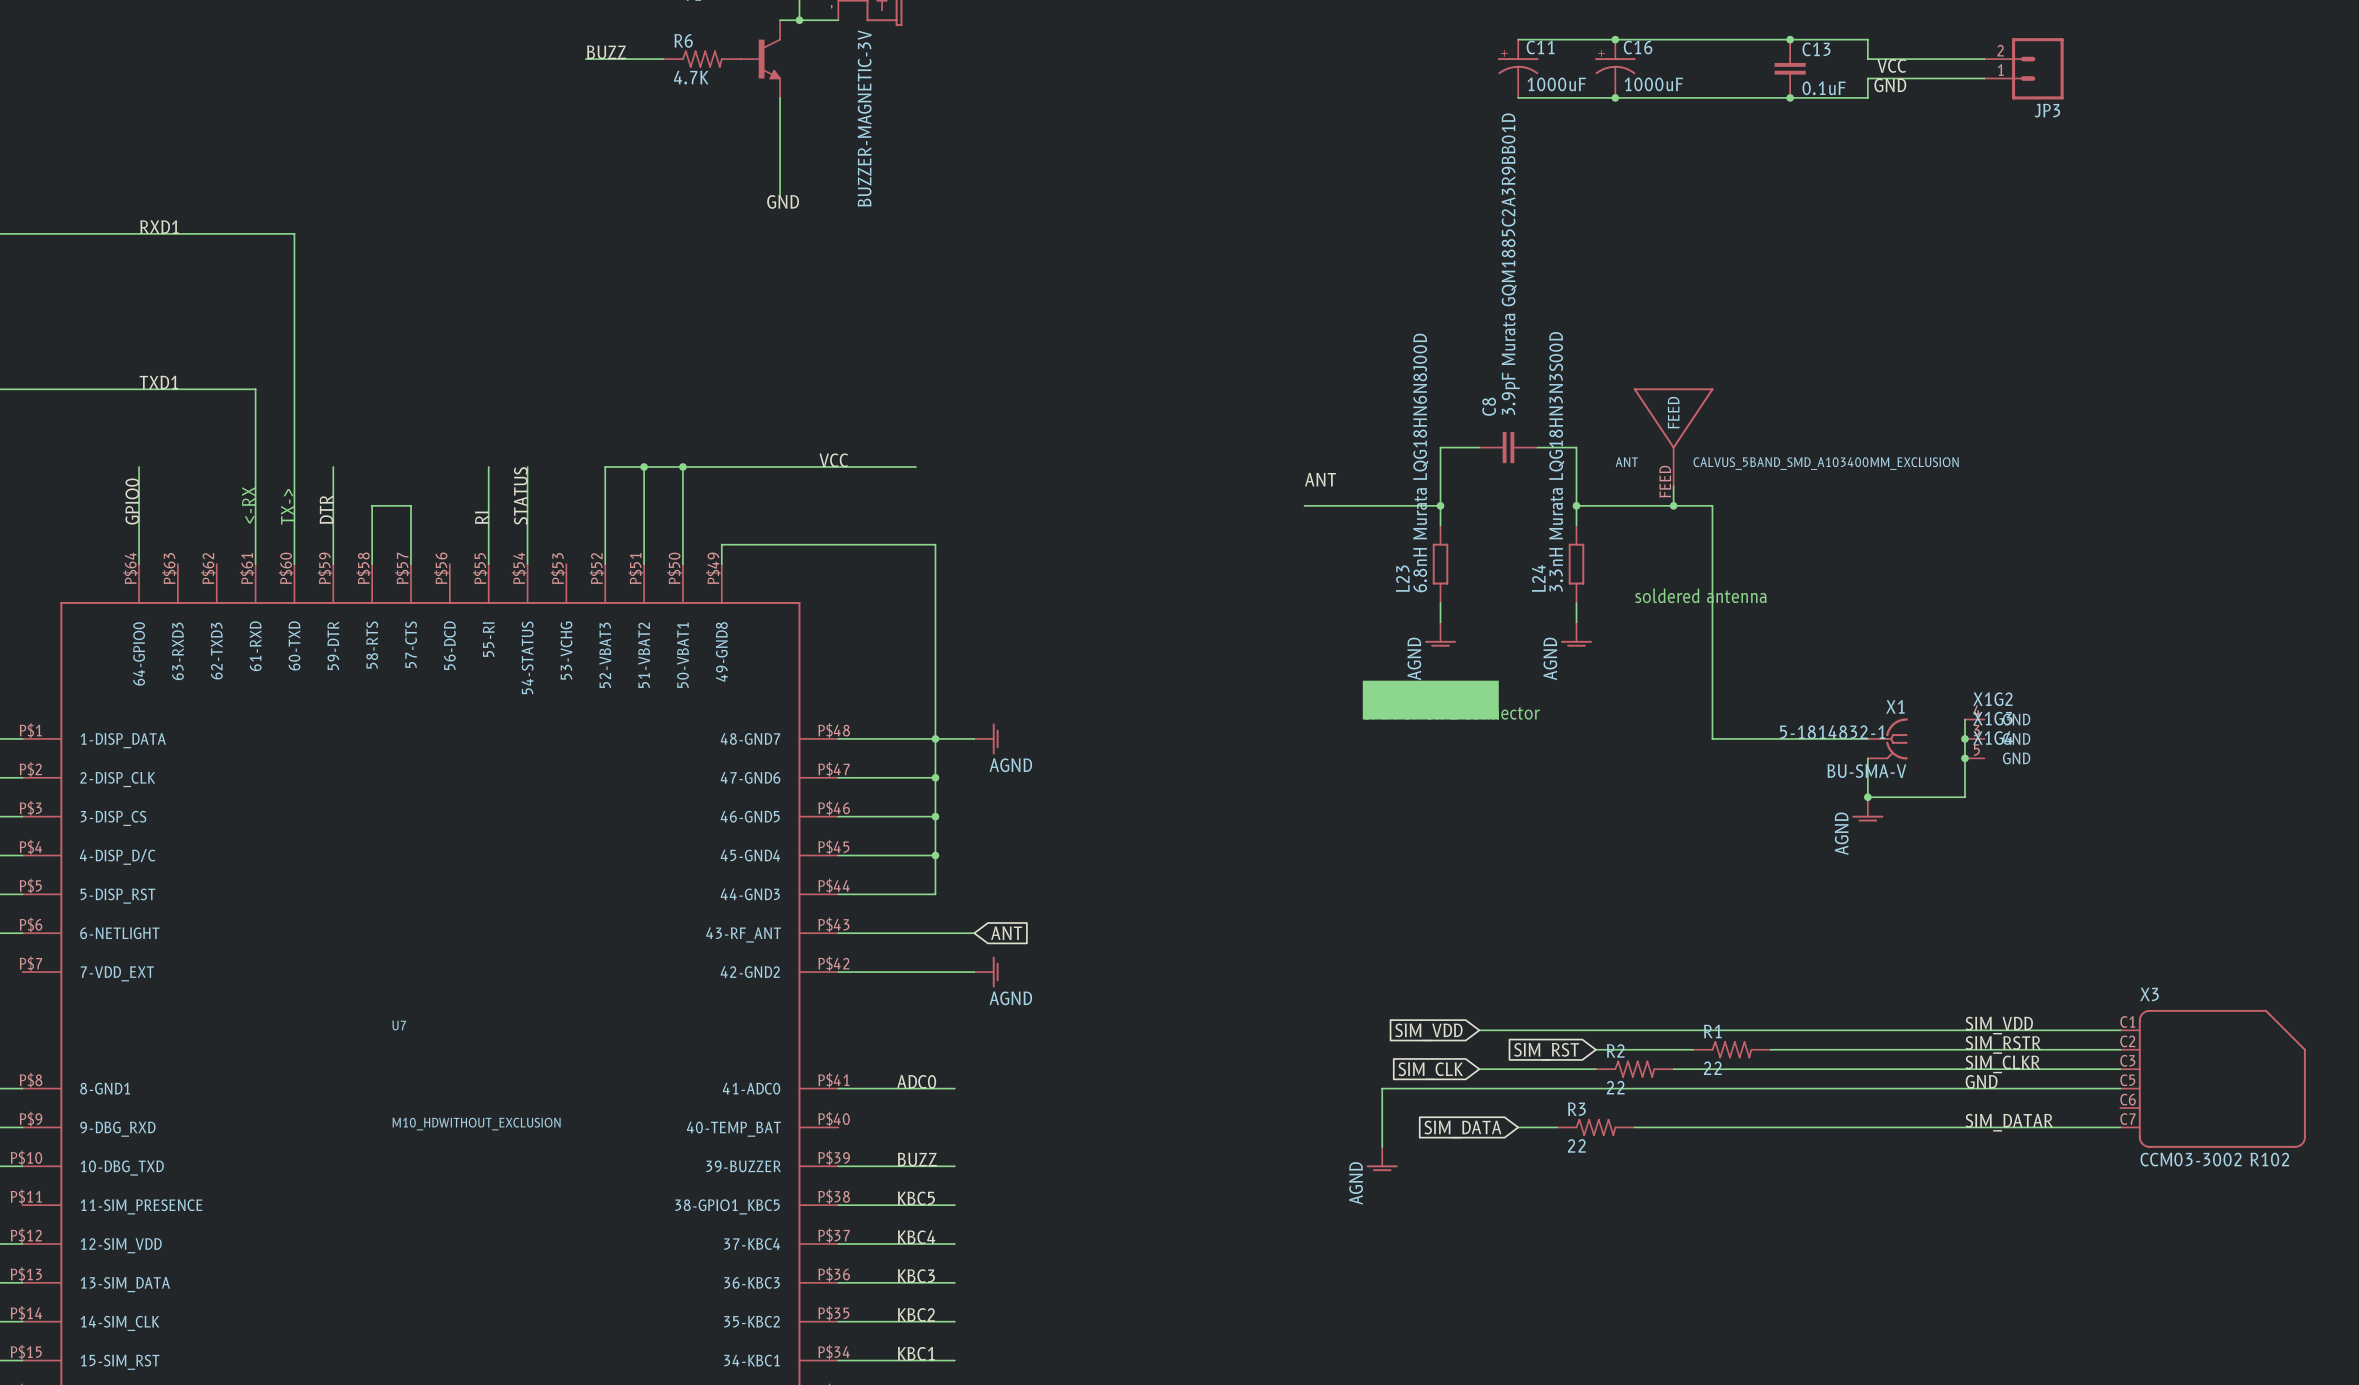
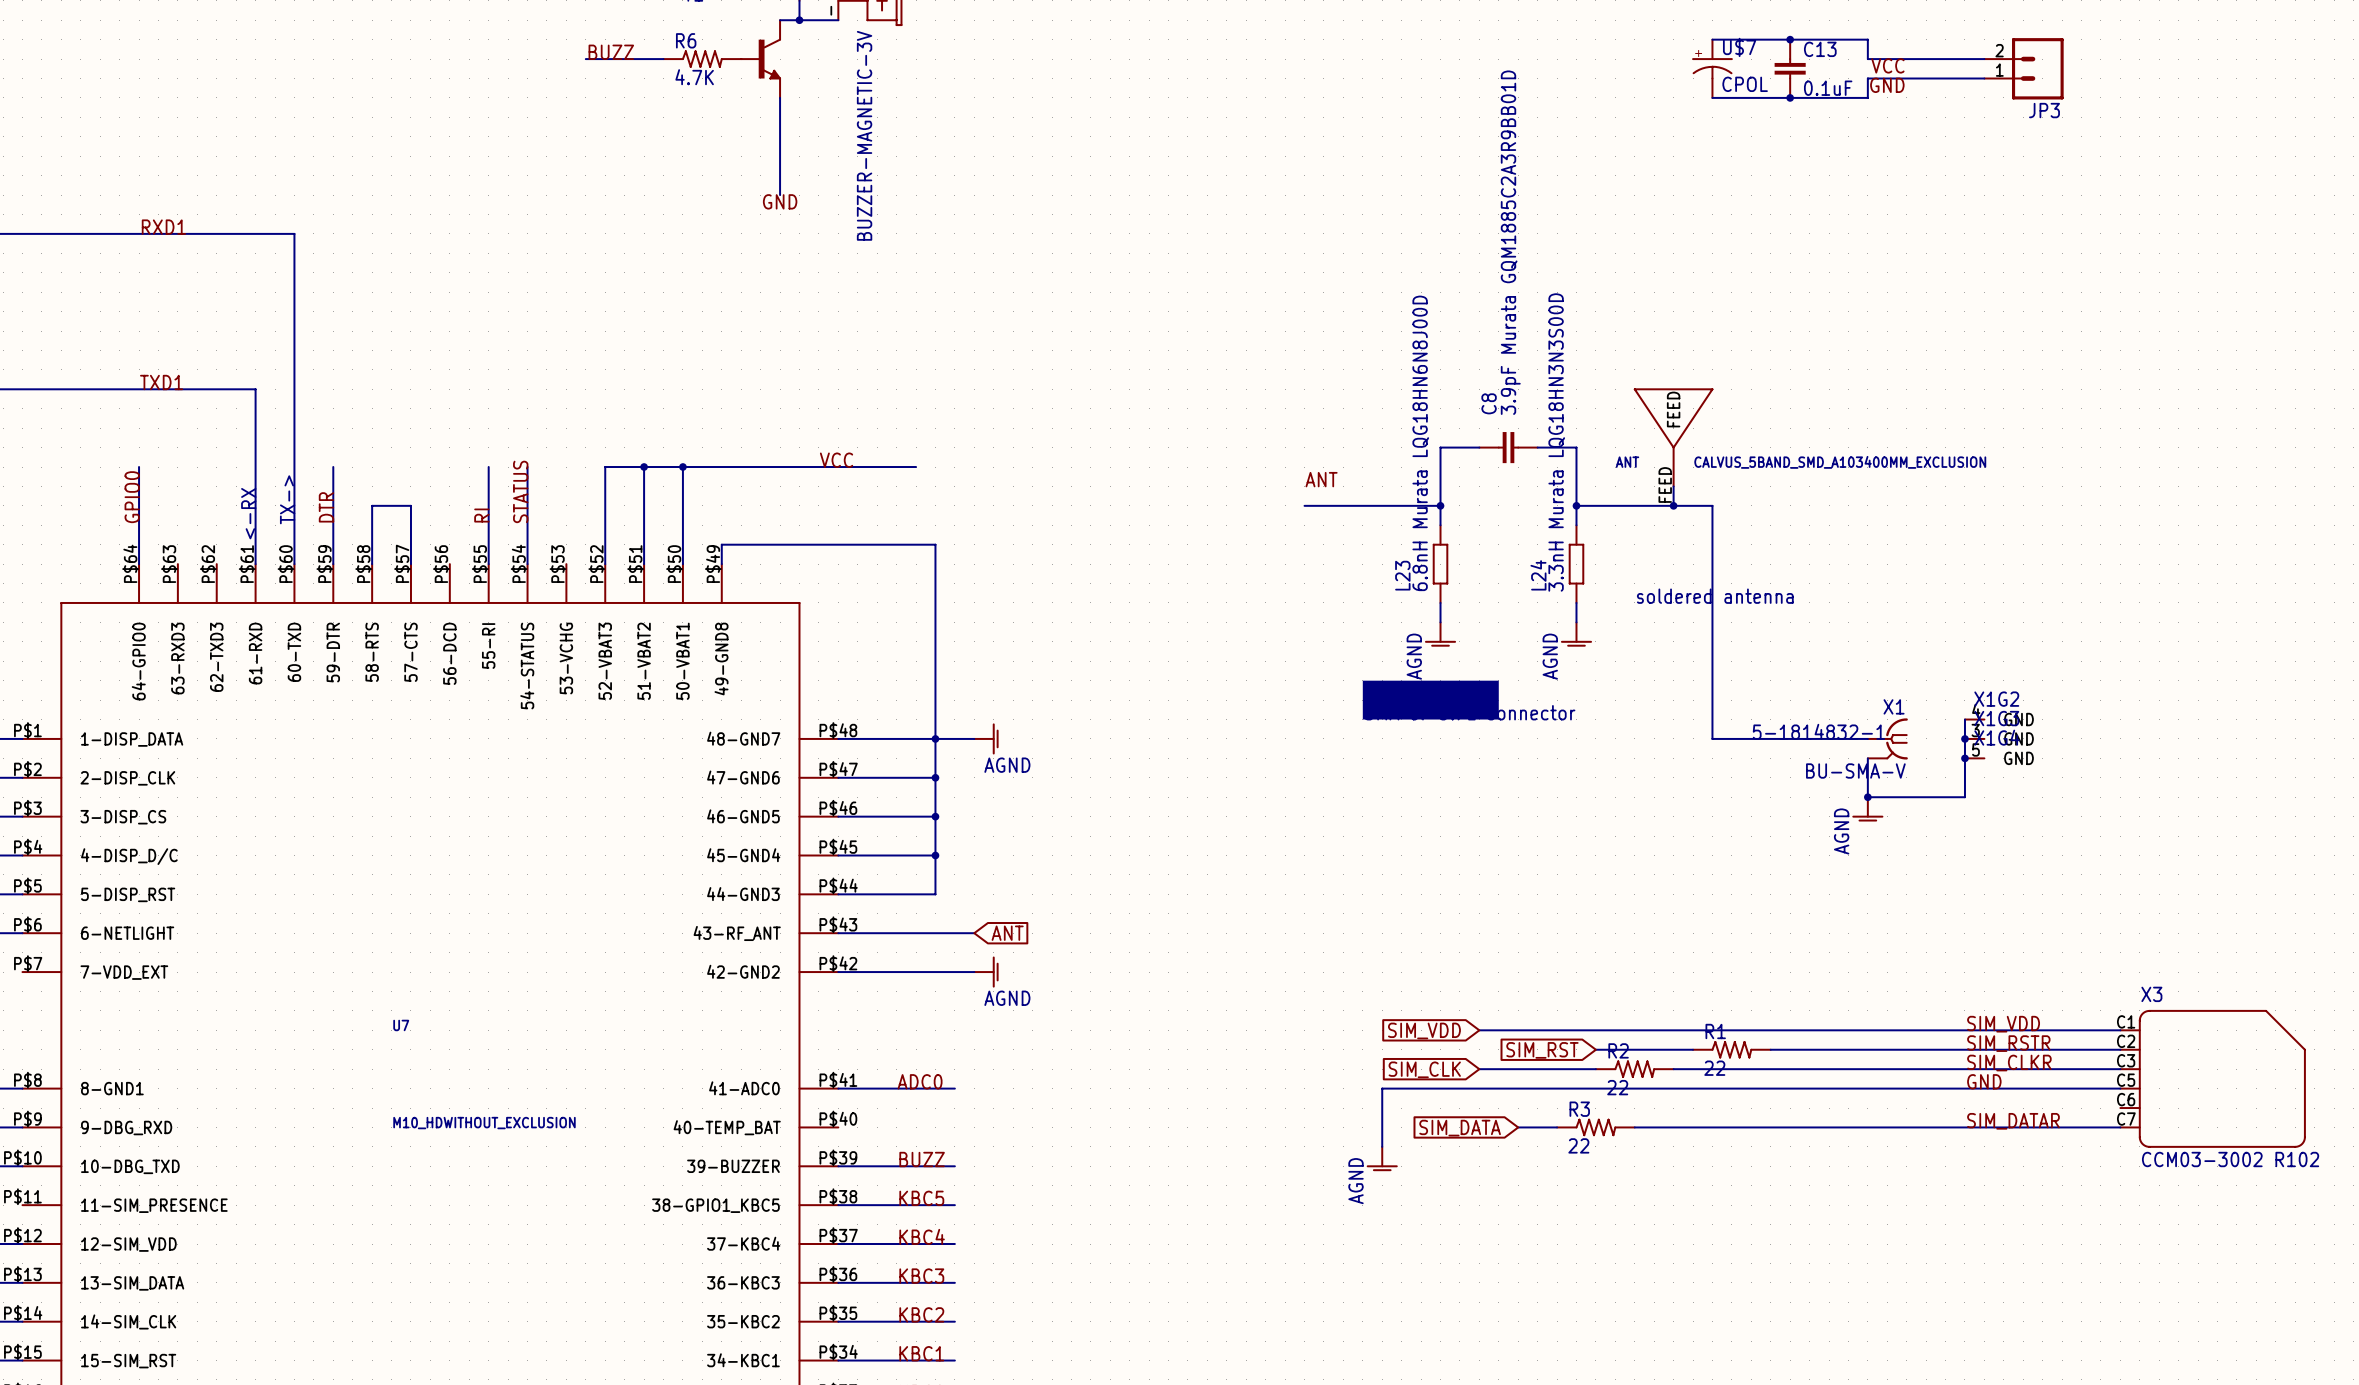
wire: (1518, 39) (1712, 39) -> none
junction: (1615, 39) -> none
C11: 1000uF (1518, 68) -> none
C16: 1000uF (1615, 68) -> none
U$7: none -> CPOL (1712, 68)
wire: (1518, 97) (1712, 97) -> none
junction: (1615, 97) -> none

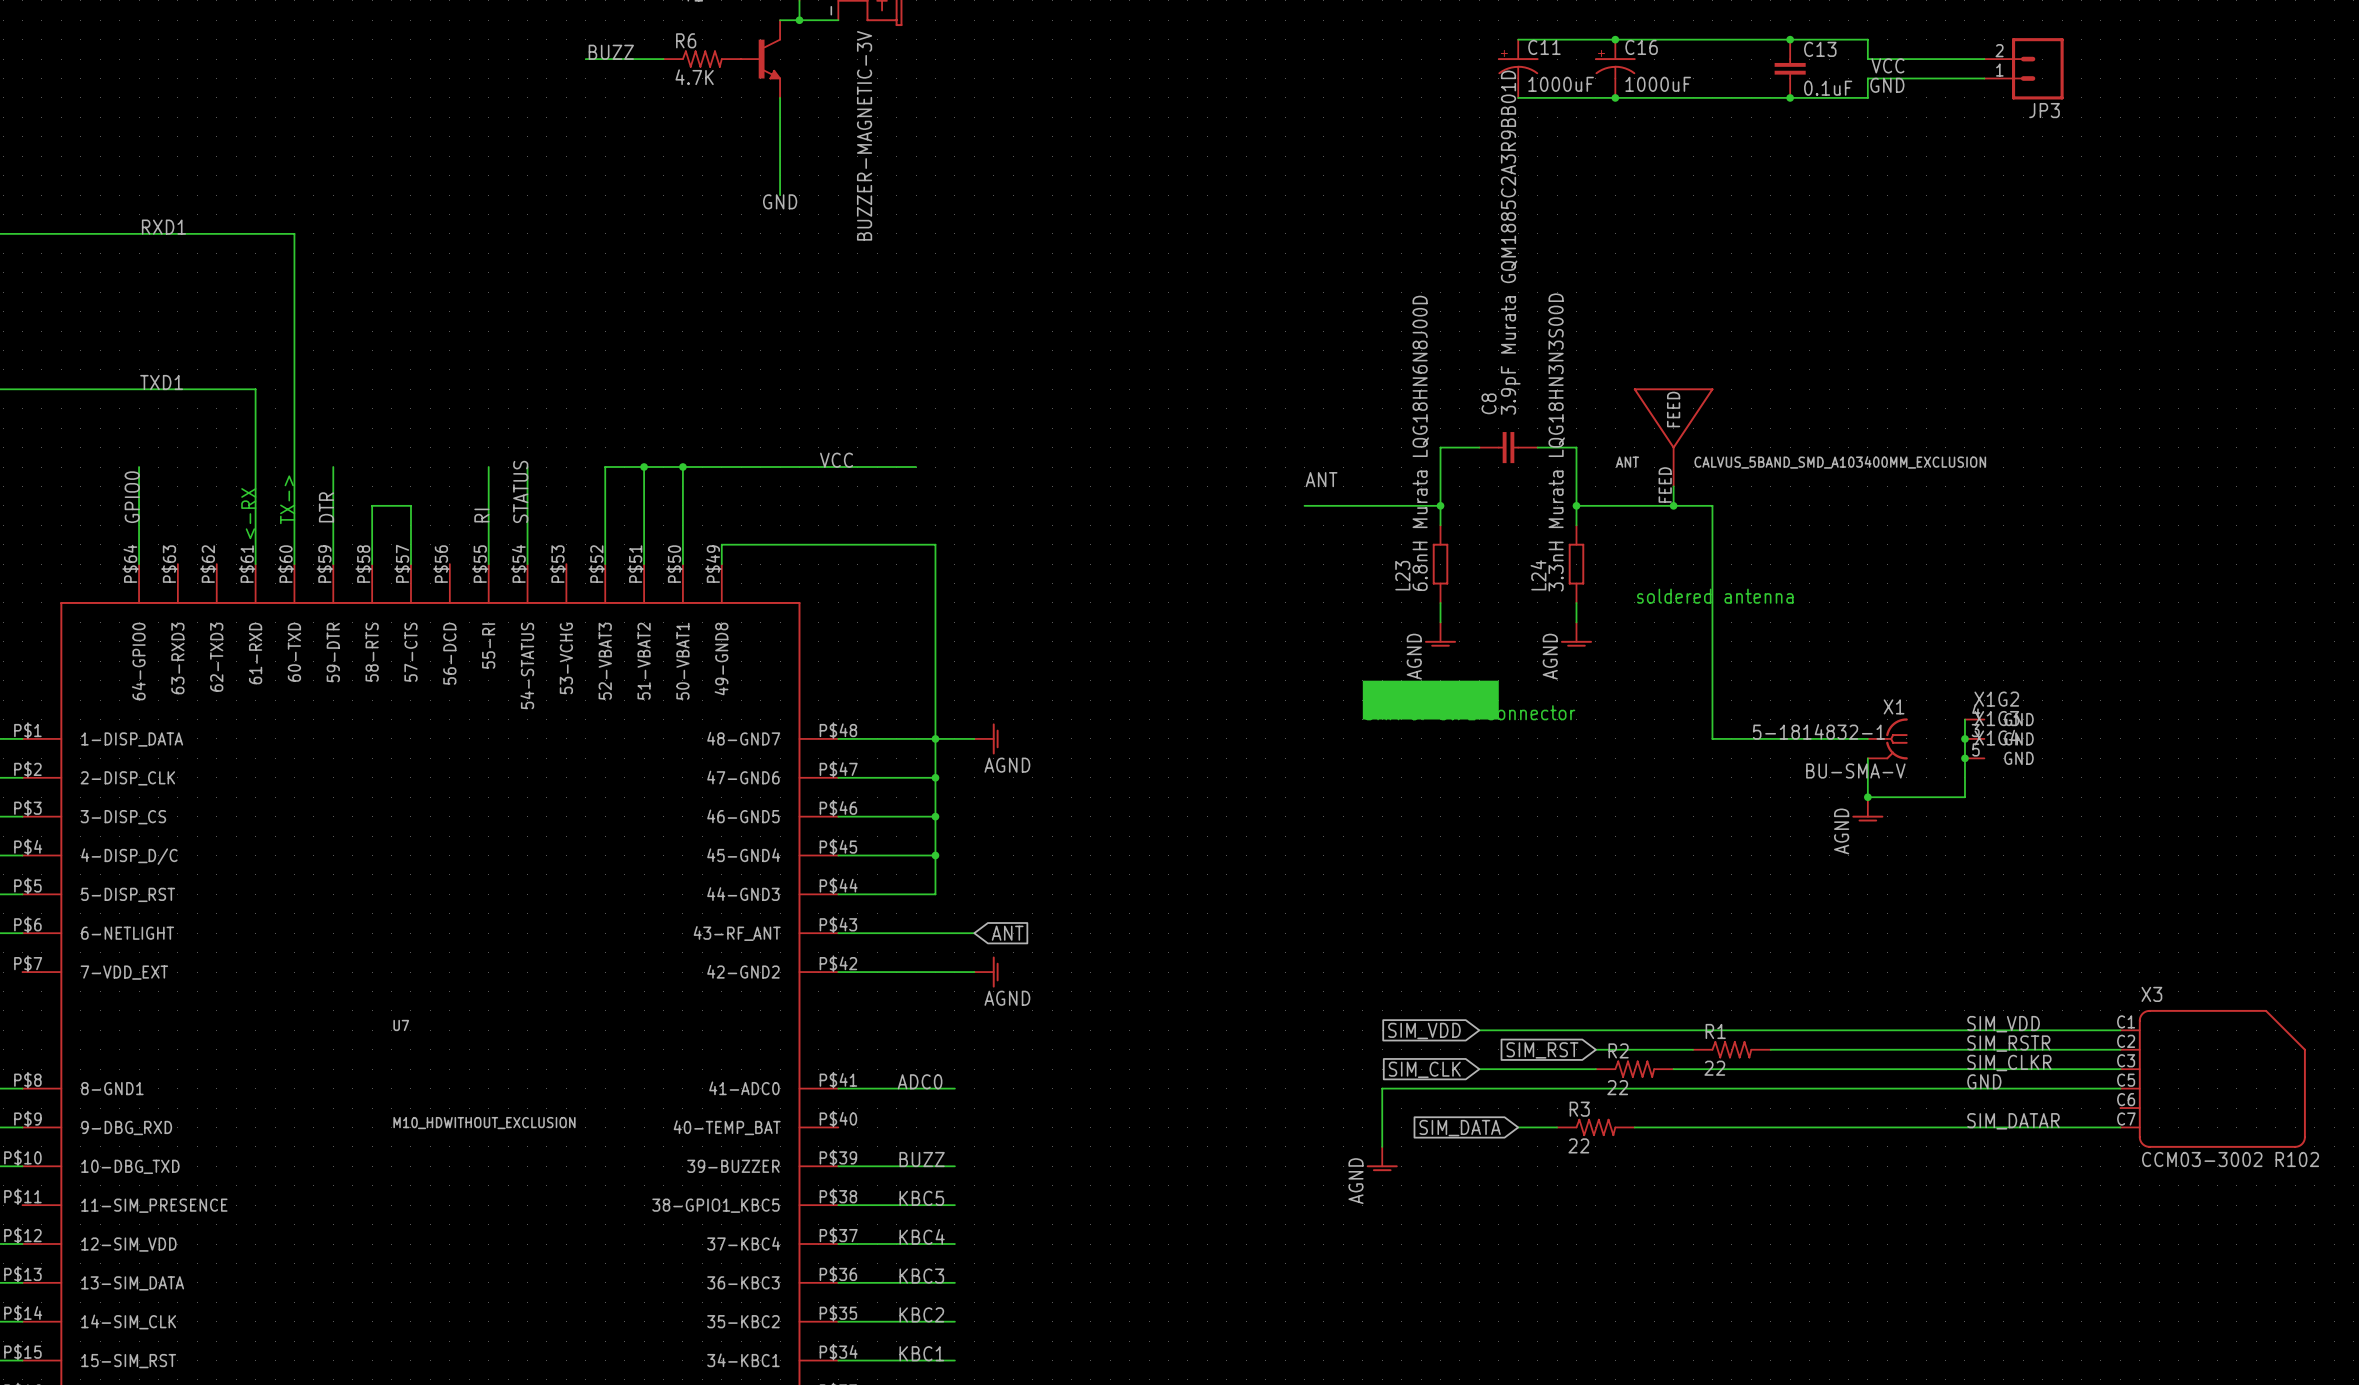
wire: none -> (1518, 39) (1712, 39)
junction: none -> (1615, 39)
C11: none -> 1000uF (1518, 68)
C16: none -> 1000uF (1615, 68)
U$7: CPOL (1712, 68) -> none
wire: none -> (1518, 97) (1712, 97)
junction: none -> (1615, 97)

